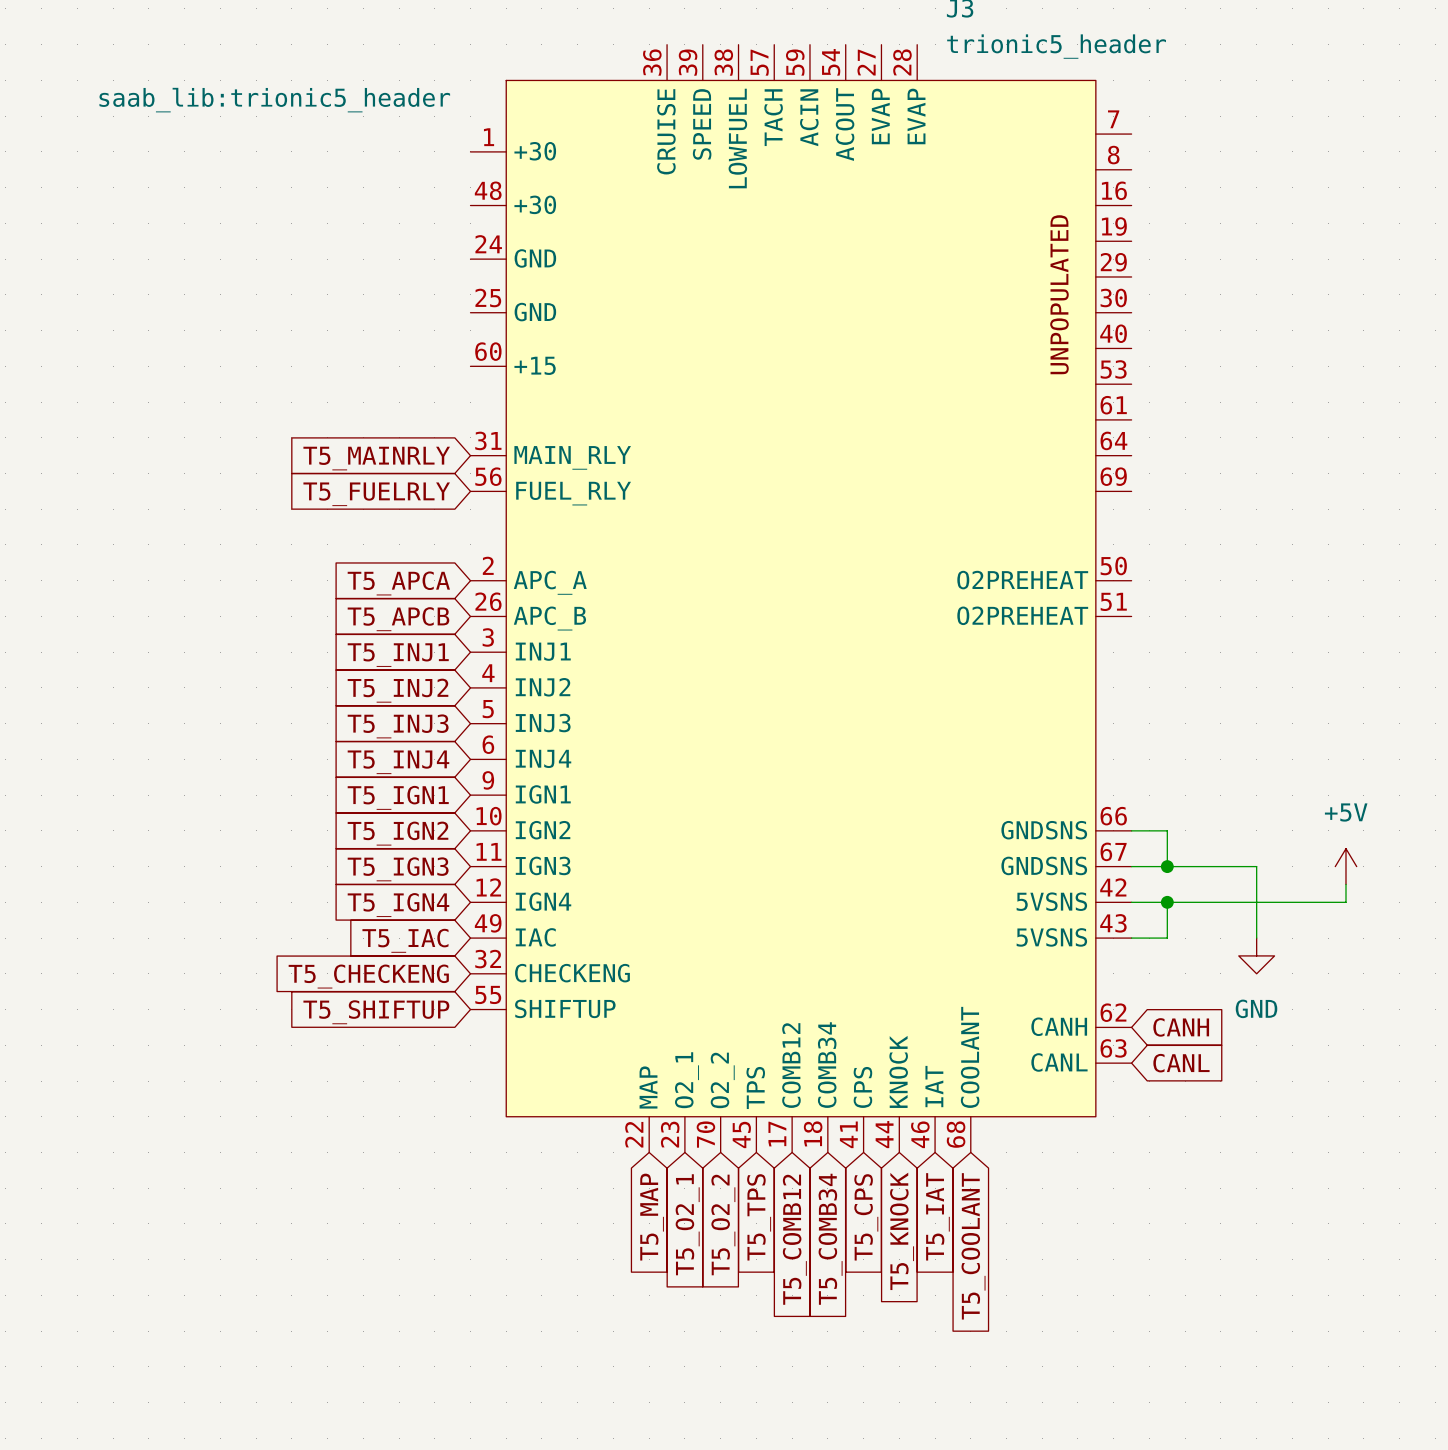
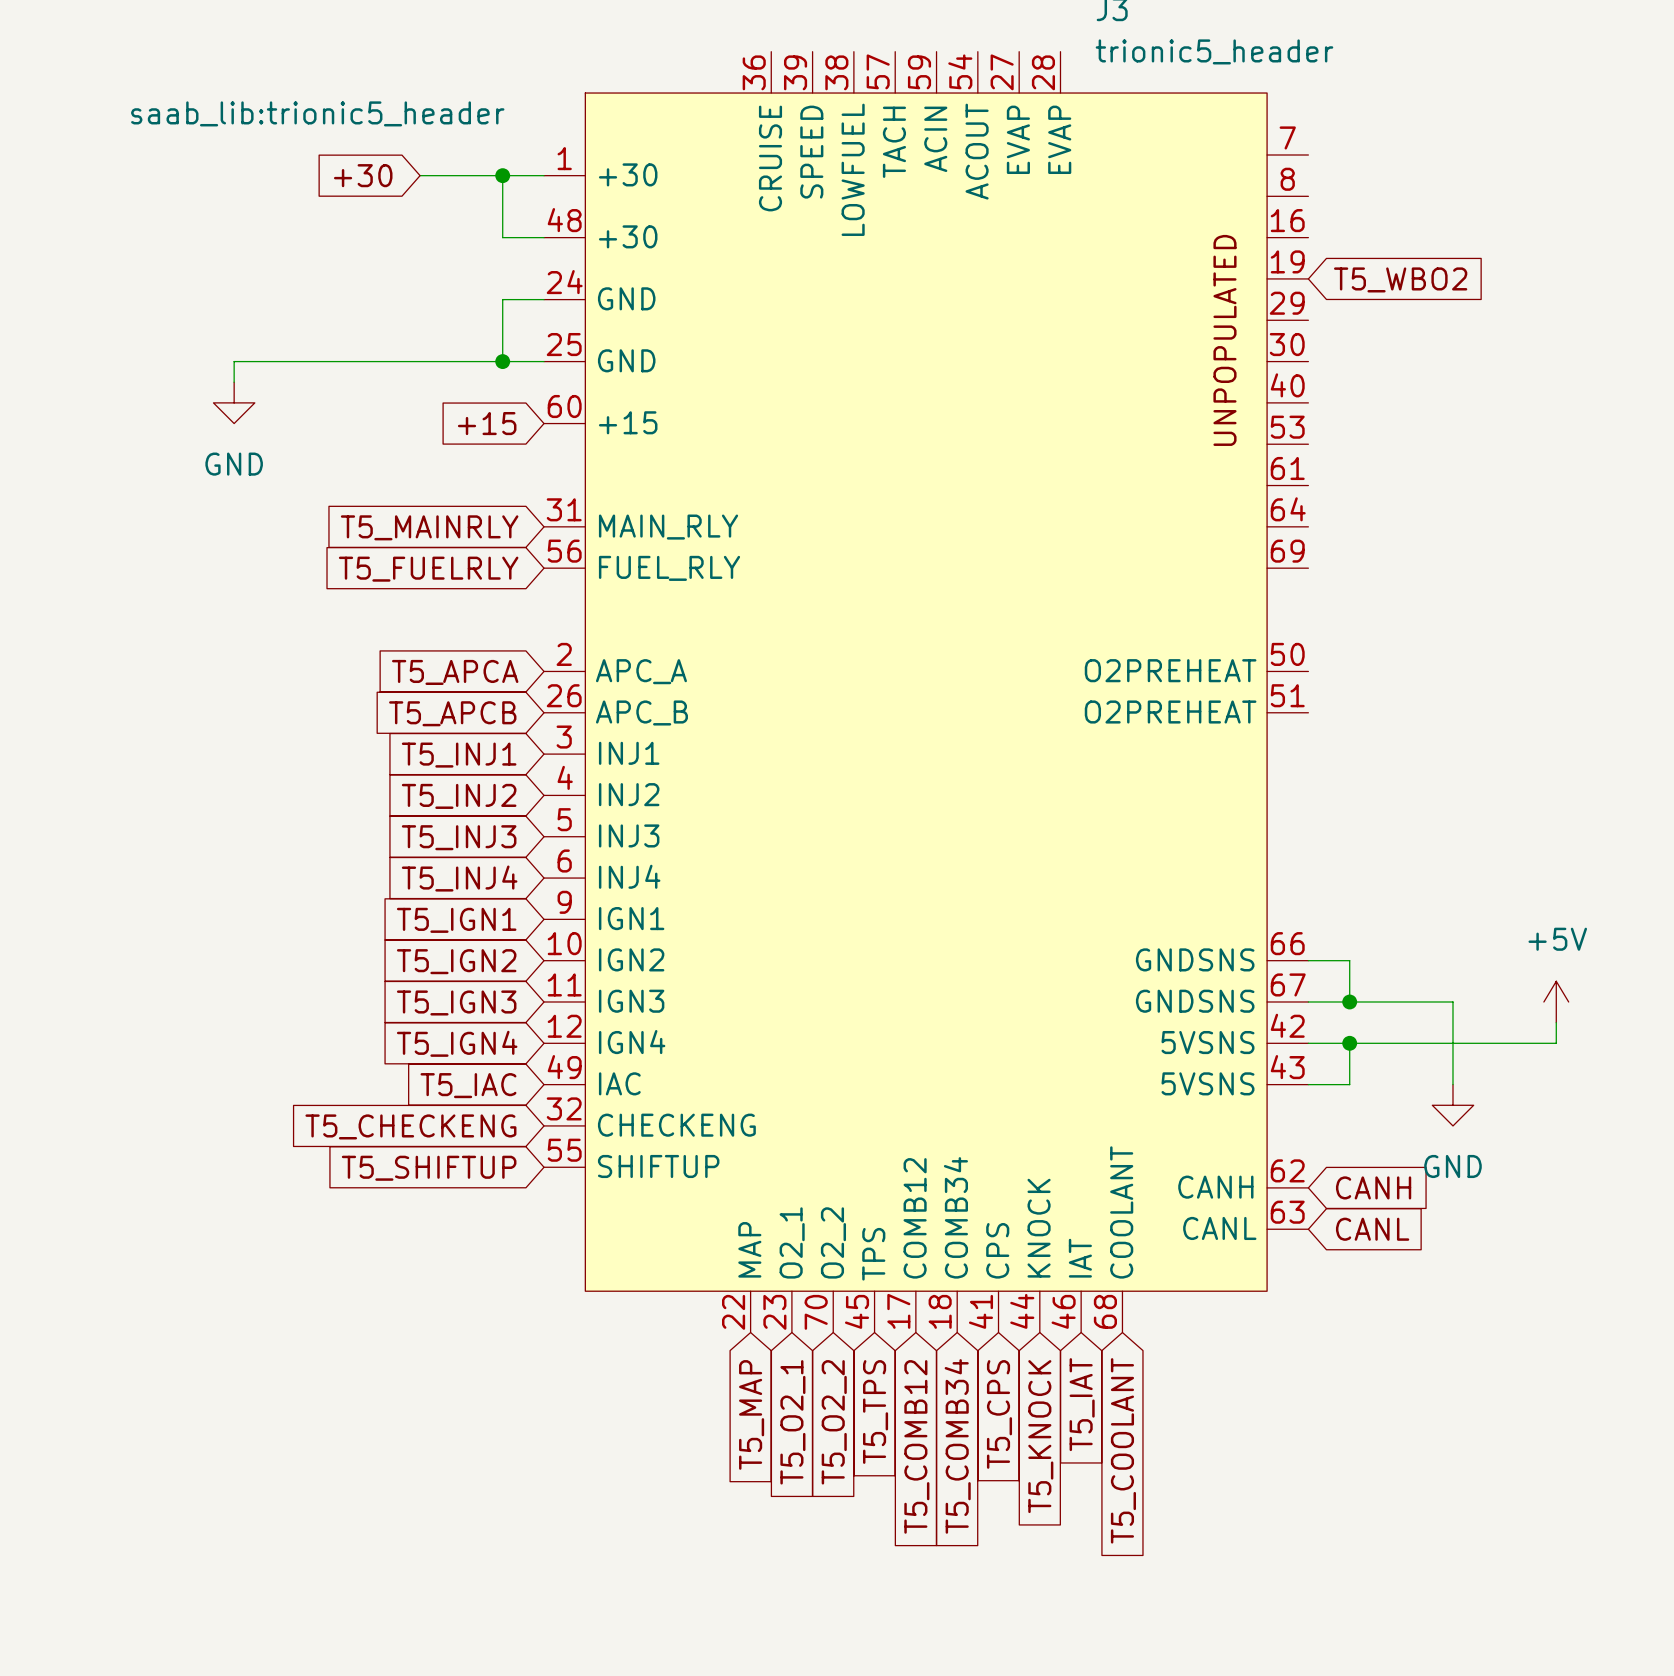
global label: none -> +30 (363, 175)
wire: none -> (420, 175) (544, 175)
wire: none -> (502, 175) (502, 237) (544, 237)
junction: none -> (502, 175)
global label: none -> T5_WBO2 (1400, 279)
wire: none -> (544, 299) (502, 299) (502, 361)
junction: none -> (502, 361)
wire: none -> (544, 361) (234, 361) (234, 382)
power symbol: none -> GND (234, 402)
global label: none -> +15 (487, 423)

